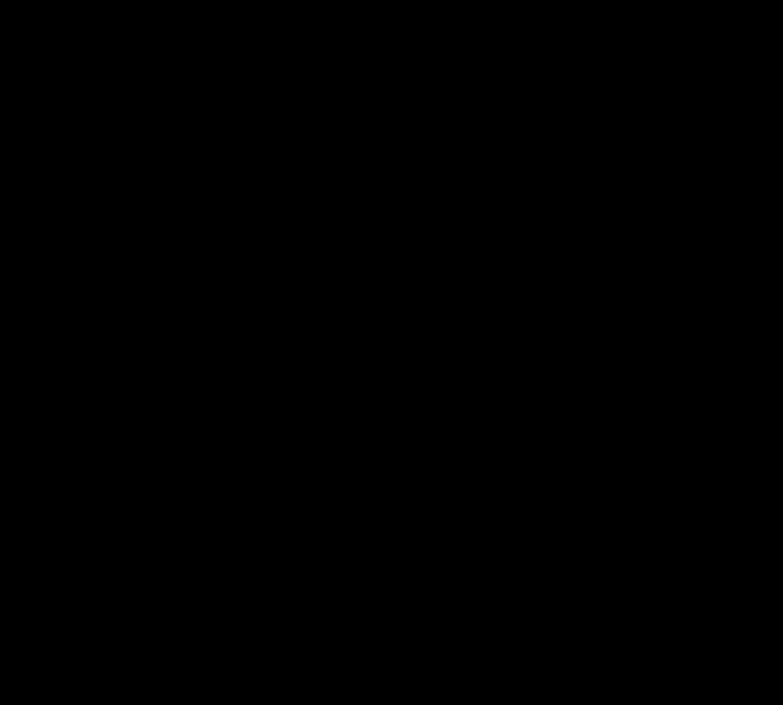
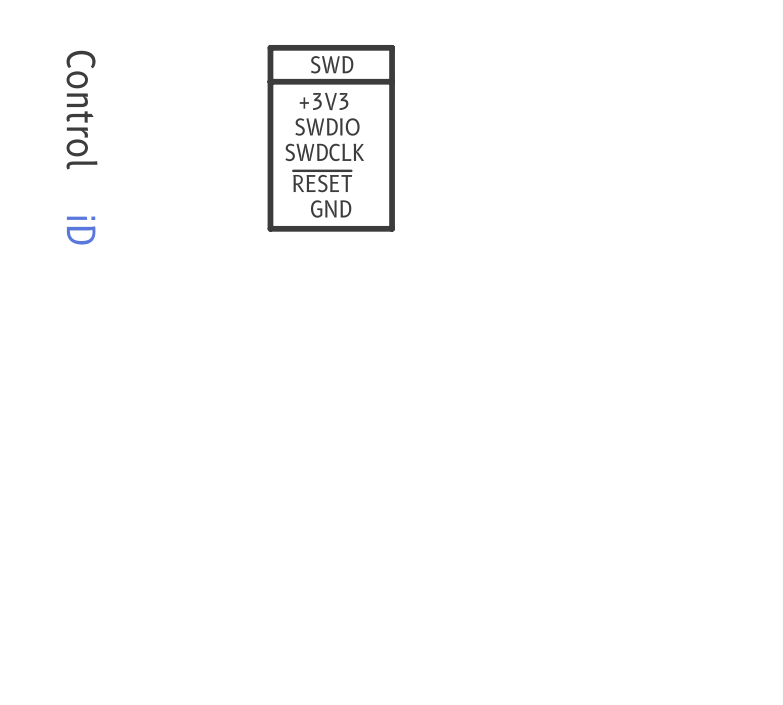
line: none -> (392, 47) (270, 47) (270, 228) (392, 228) (392, 47)
text: none -> SWD (332, 64)
line: none -> (392, 81) (270, 81)
text: none -> +3V3 (324, 101)
text: none -> Control (82, 110)
text: none -> SWDIO (327, 126)
text: none -> SWDCLK (324, 152)
text: none -> ~{RESET} (322, 181)
text: none -> GND (331, 208)
text: none -> iD (81, 230)

